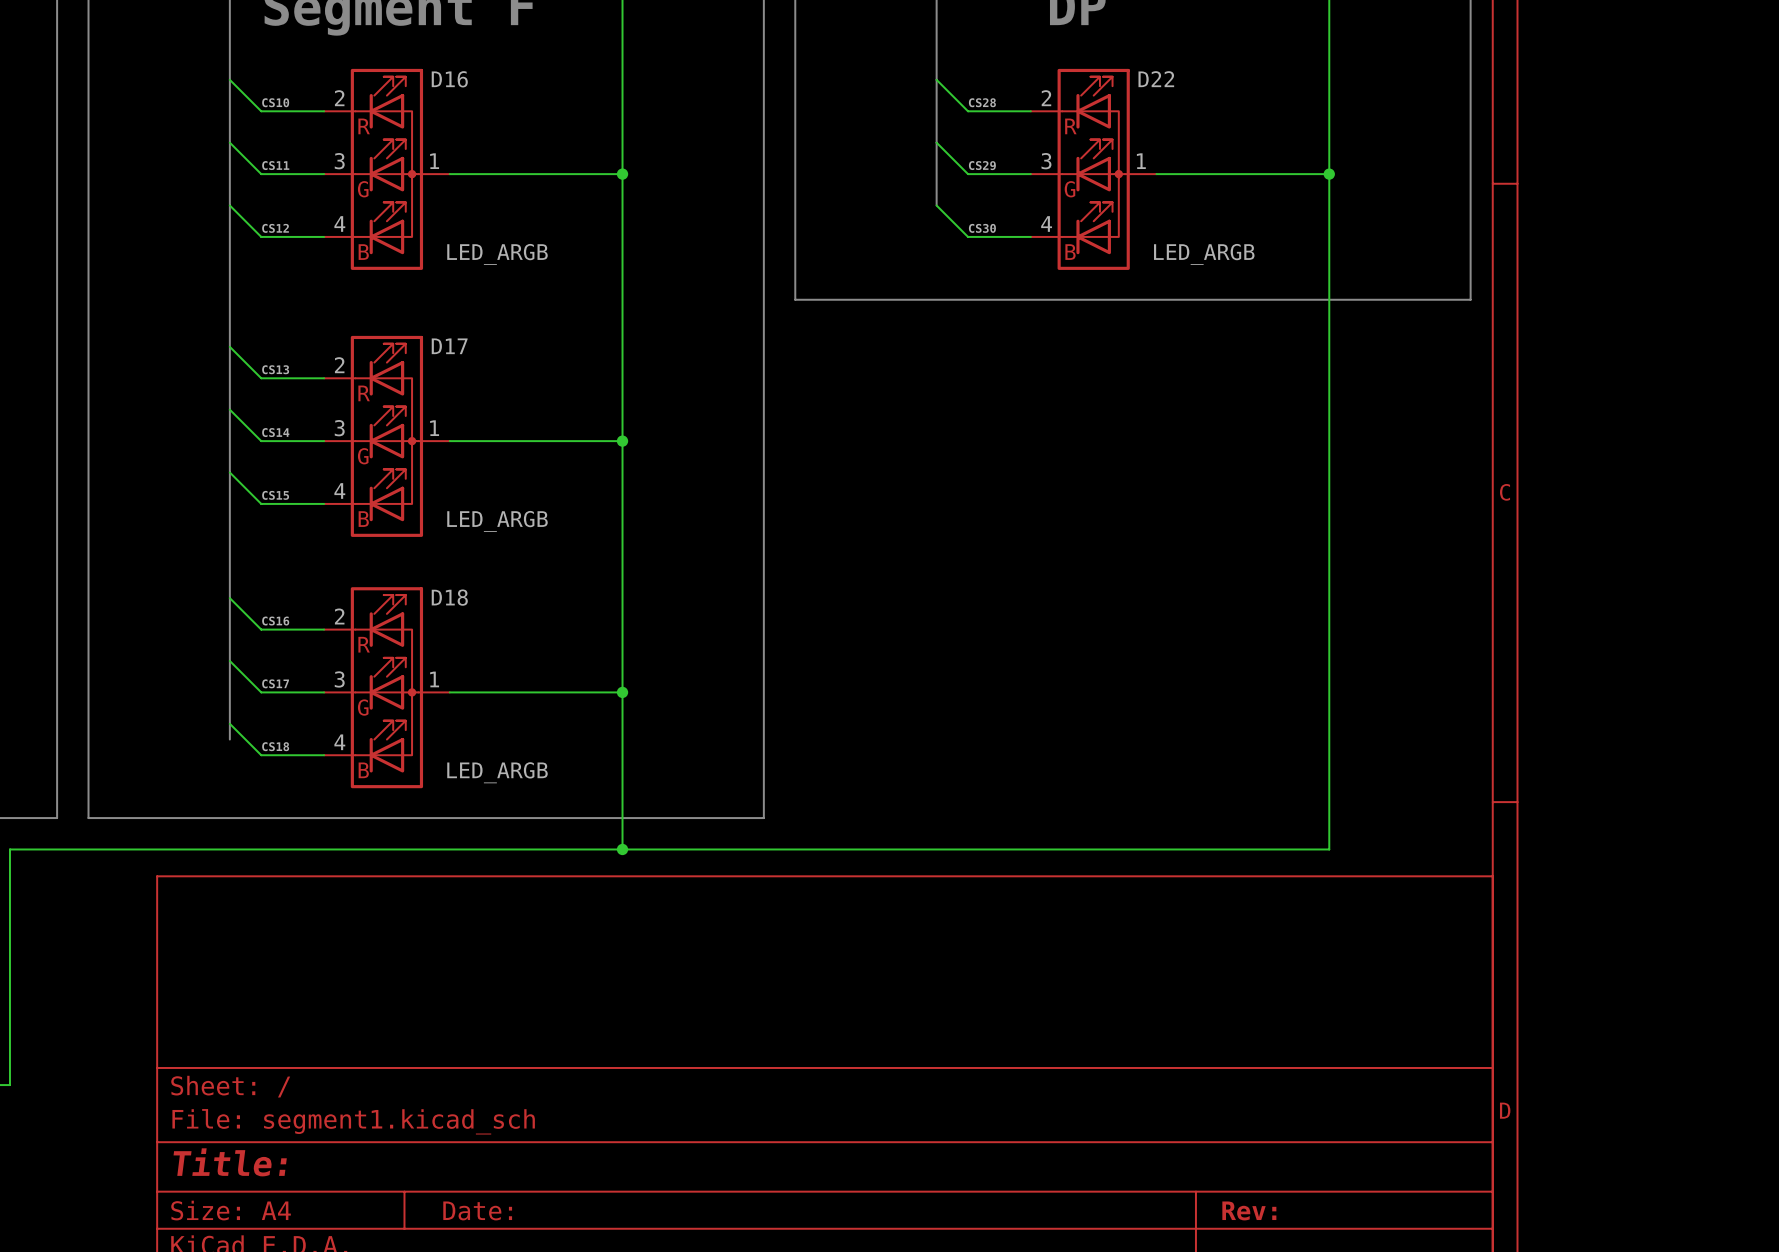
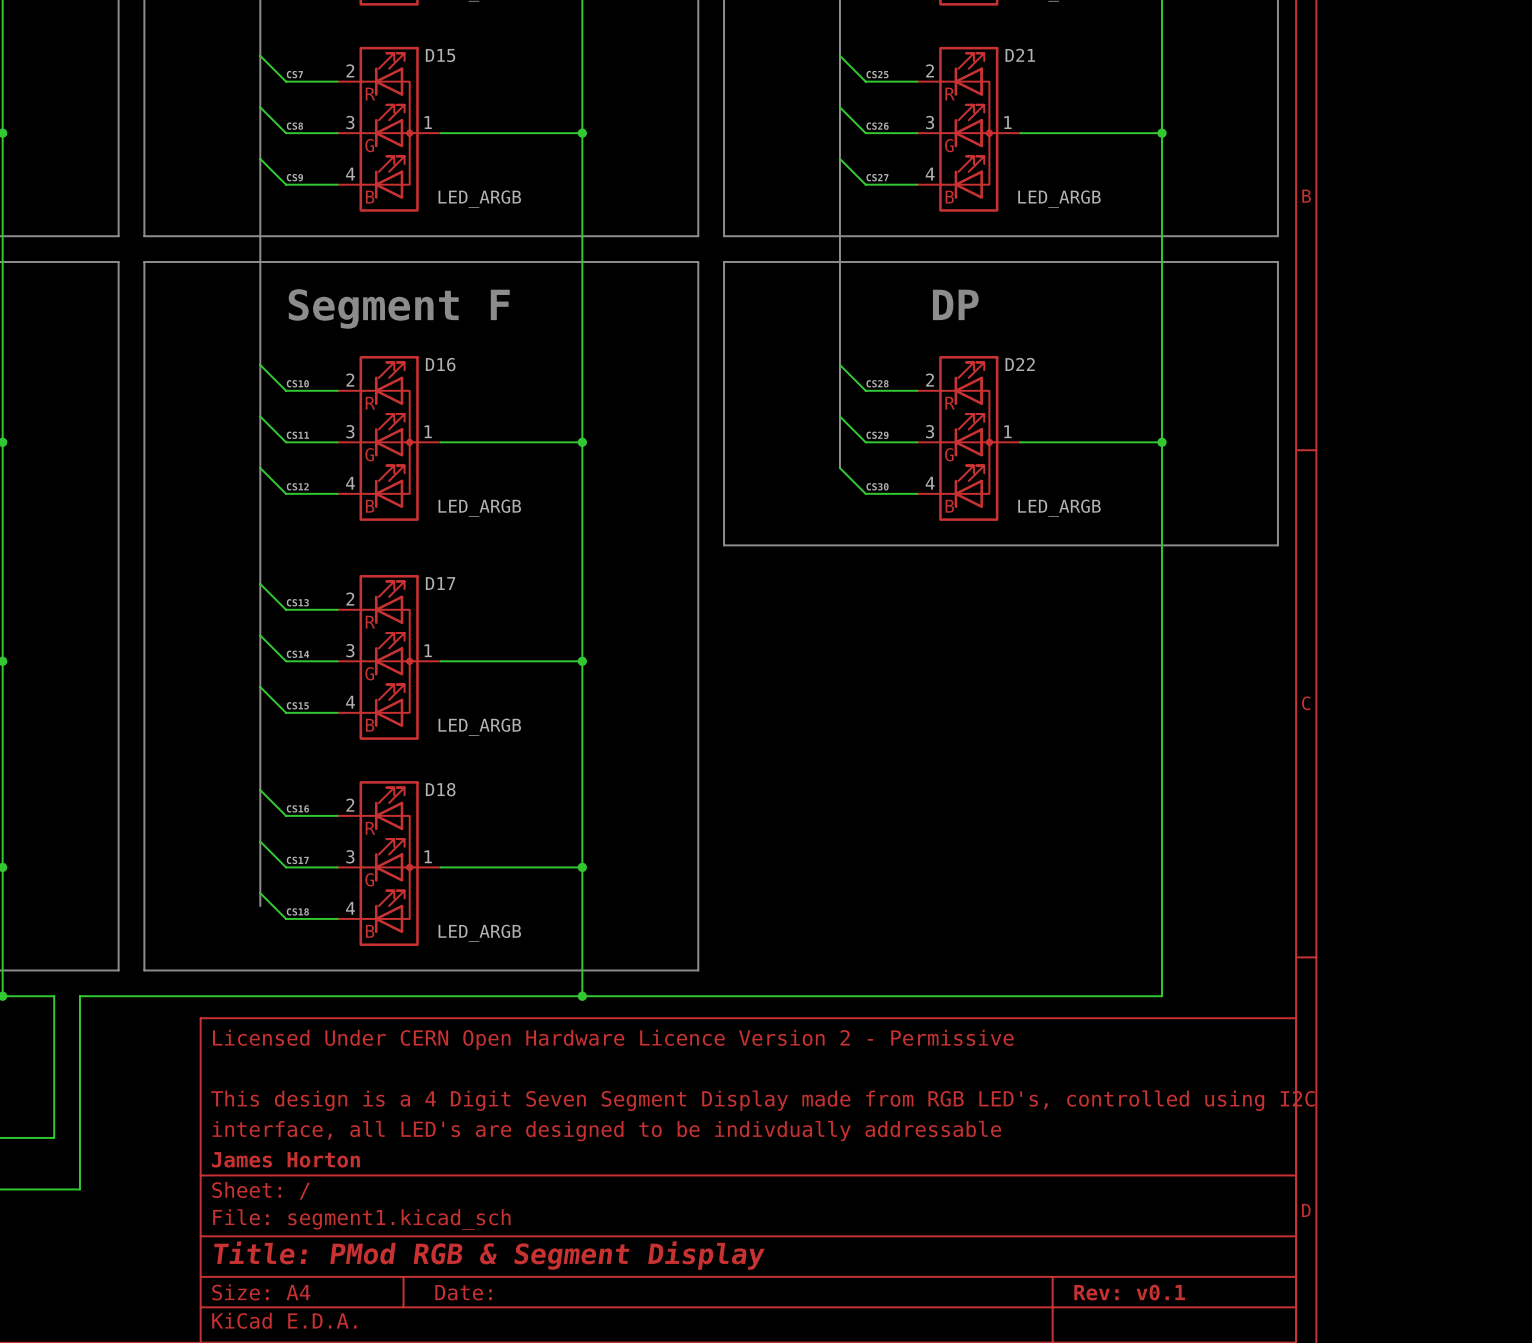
title block: none -> Licensed Under CERN Open Hardware Licence Version 2 - Permissive (613, 1039)
title block: none -> This design is a 4 Digit Seven Segment Display made from RGB LED's, controlled using I2C (763, 1100)
title block: none -> interface, all LED's are designed to be indivdually addressable (606, 1131)
title block: none -> James Horton (285, 1159)
title block: Title: (230, 1162) -> Title: PMod RGB & Segment Display (489, 1255)
title block: Rev: (1249, 1210) -> Rev: v0.1 (1129, 1292)

